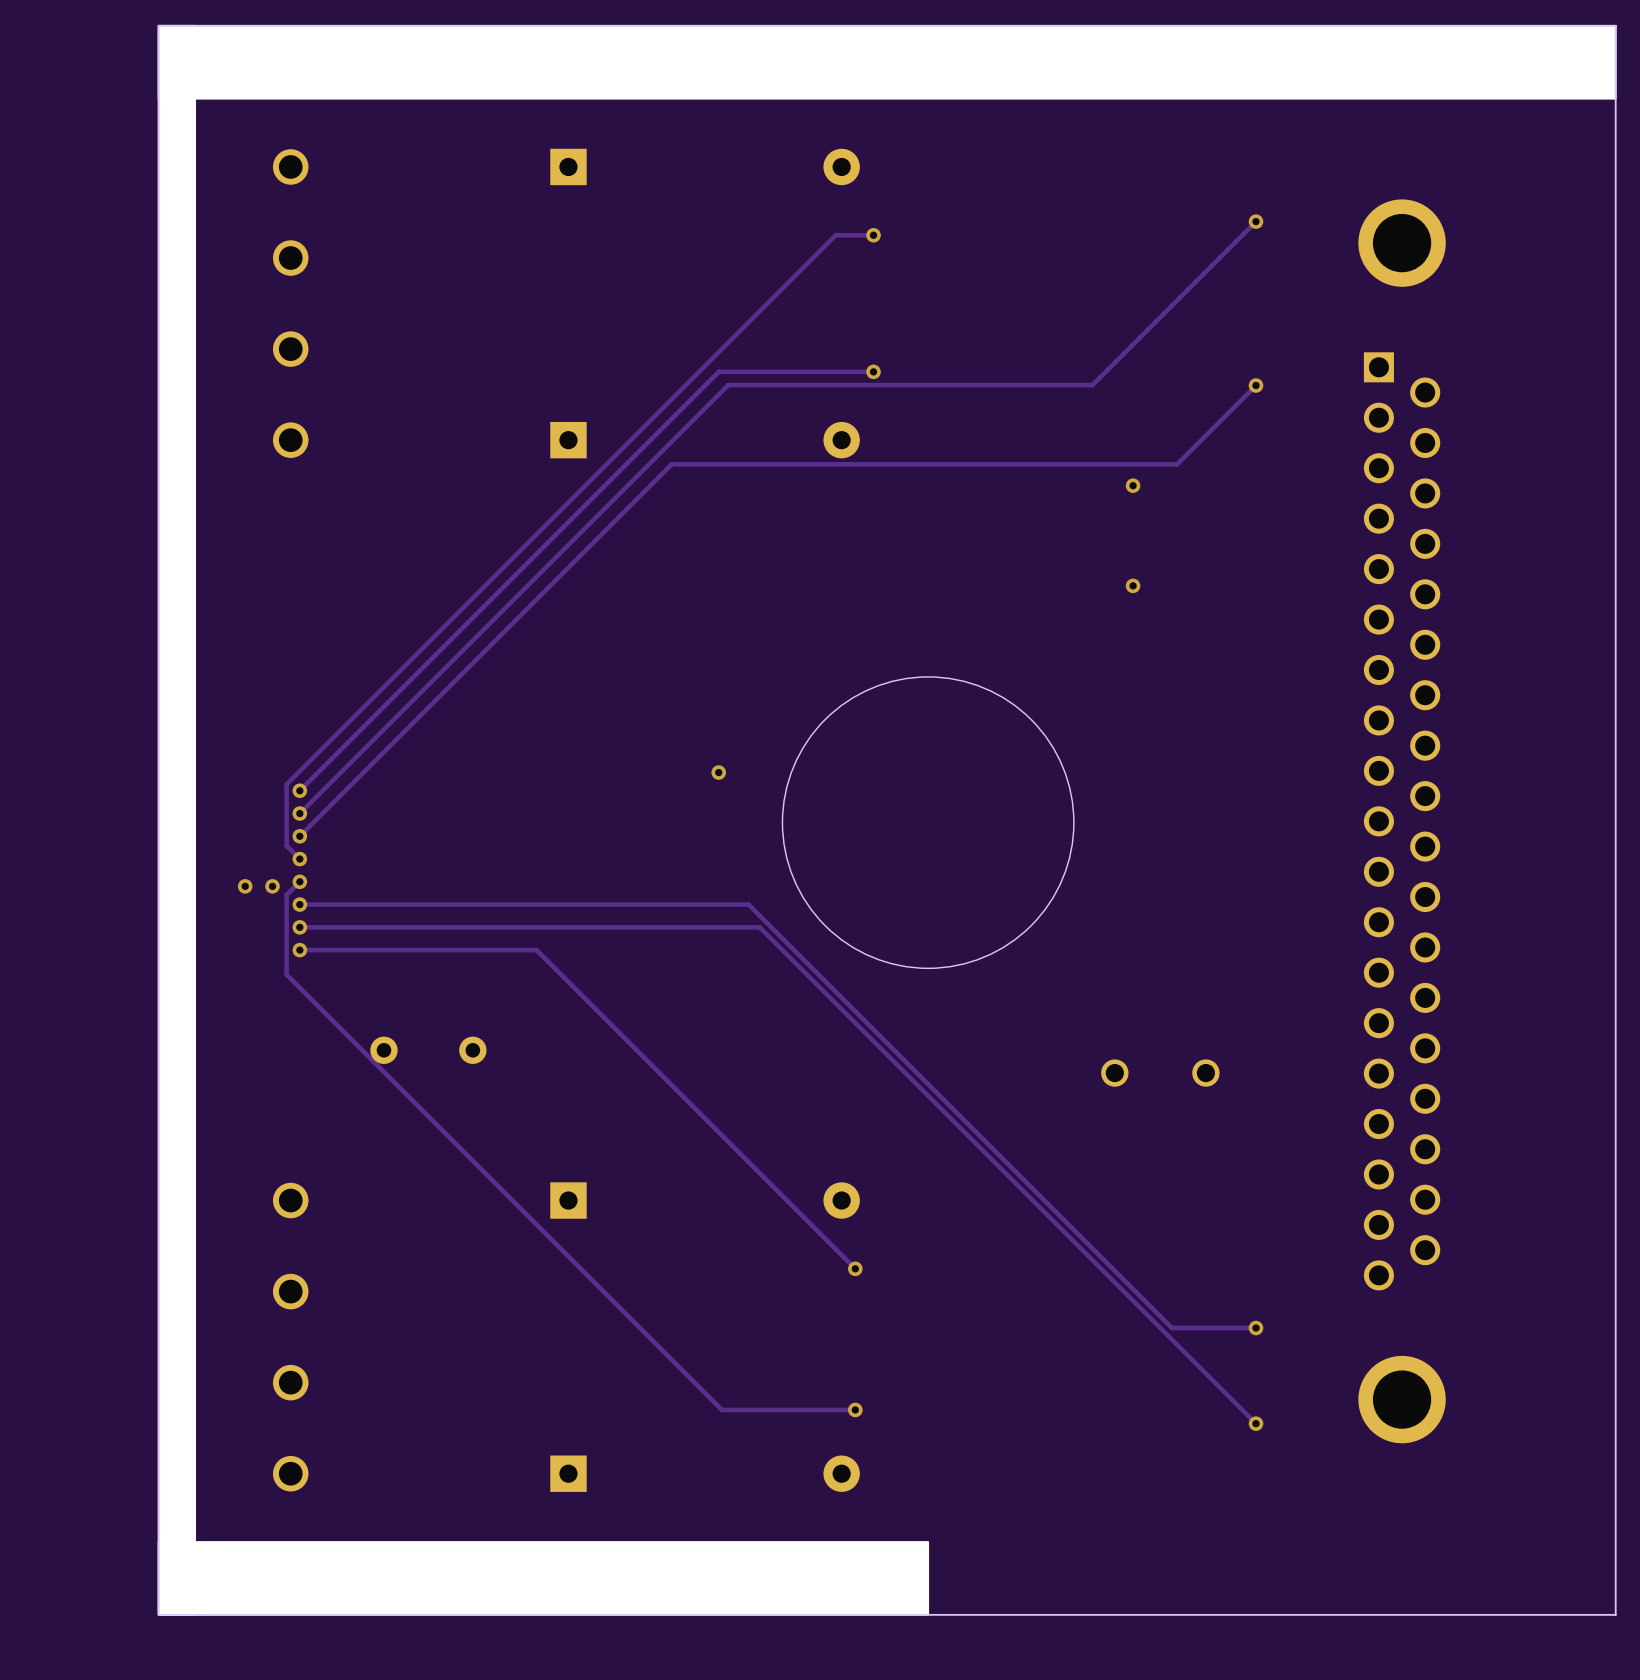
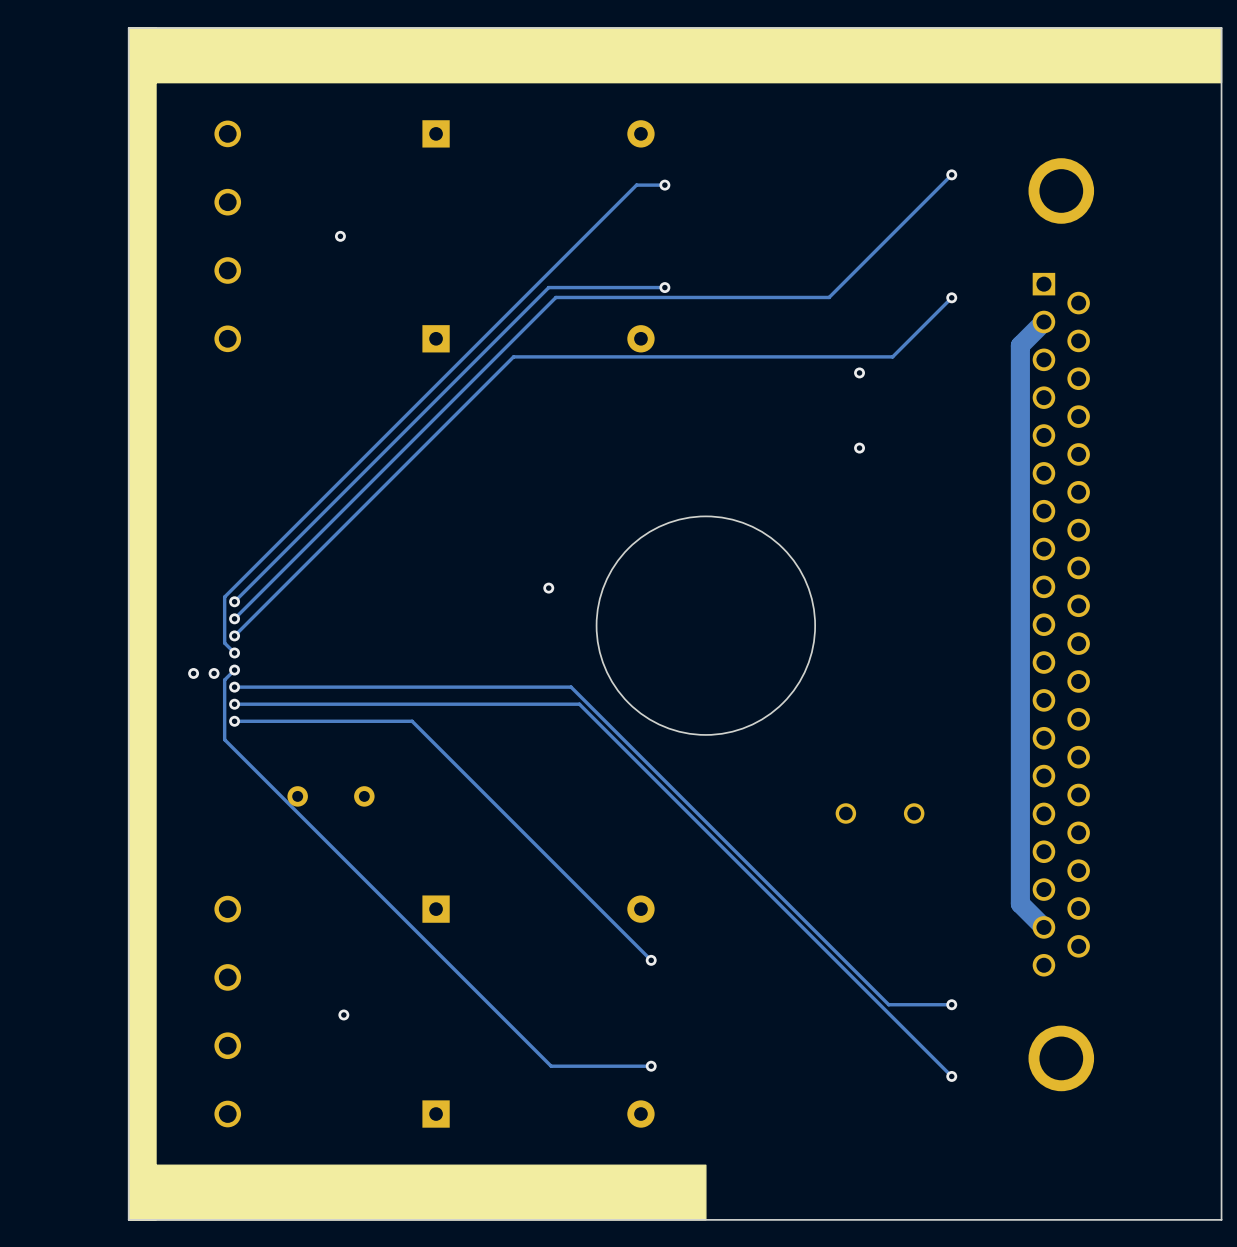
via: none -> (340, 236)
track: none -> (1043, 321) (1020, 345) (1020, 903) (1043, 927)
via: none -> (343, 1014)

